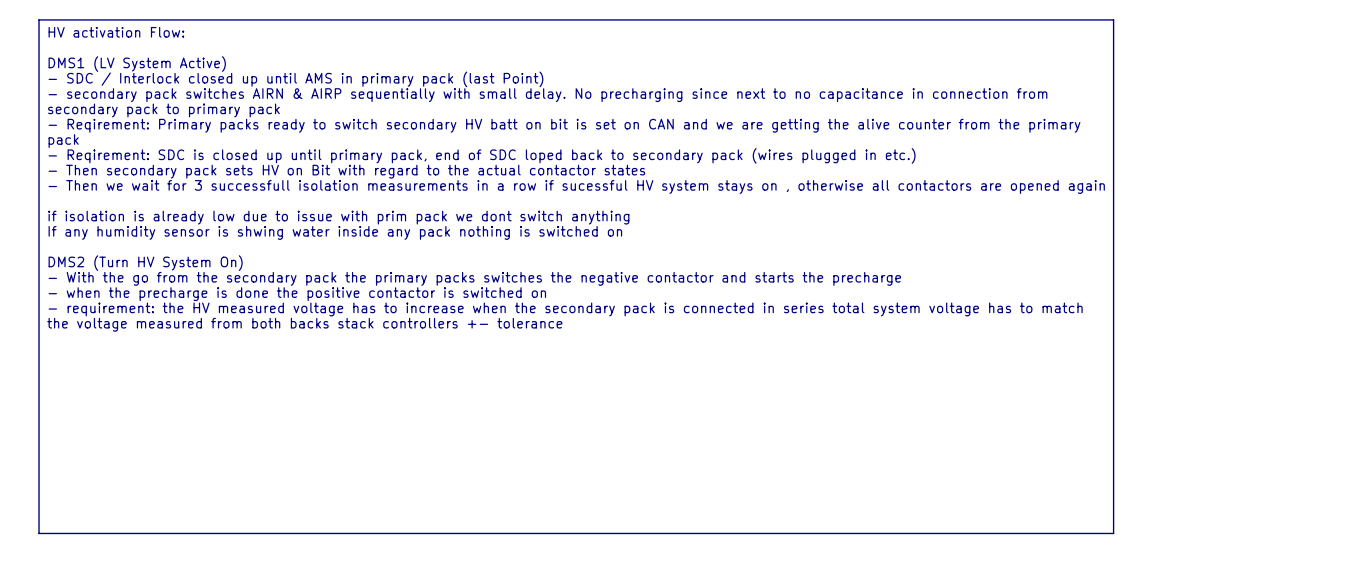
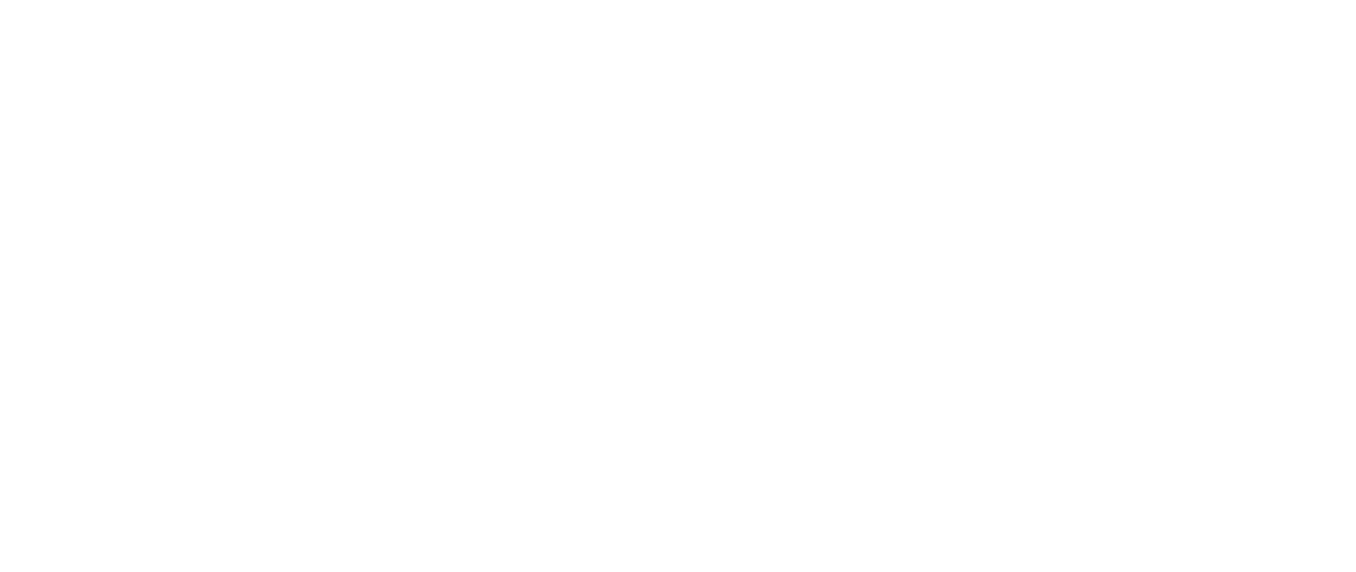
line: (39, 19) (1113, 19) (1113, 533) (39, 533) (39, 19) -> none
text: HV activation Flow: (116, 32) -> none
text: DMS1 (LV System Active) (137, 64) -> none
text: - SDC / Interlock closed up until AMS in primary pack (last Point) (295, 79) -> none
text: - secondary pack switches AIRN & AIRP sequentially with small delay. No precharging since next to no capacitance in connection from (547, 95) -> none
text: secondary pack to primary pack (163, 110) -> none
text: - Reqirement: Primary packs ready to switch secondary HV batt on bit is set on CAN and we are getting the alive counter from the primary (564, 125) -> none
text: pack (63, 141) -> none
text: - Reqirement: SDC is closed up until primary pack, end of SDC loped back to secondary pack (wires plugged in etc.) (482, 155) -> none
text: - Then secondary pack sets HV on Bit with regard to the actual contactor states (346, 171) -> none
text: - Then we wait for 3 successfull isolation measurements in a row if sucessful HV system stays on , otherwise all contactors are opened again (576, 186) -> none
text: if isolation is already low due to issue with prim pack we dont switch anything (338, 217) -> none
text: If any humidity sensor is shwing water inside any pack nothing is switched on (335, 232) -> none
text: DMS2 (Turn HV System On) (145, 263) -> none
text: - With the go from the secondary pack the primary packs switches the negative contactor and starts the precharge (474, 278) -> none
text: - when the precharge is done the positive contactor is switched on (297, 294) -> none
text: - requirement: the HV measured voltage has to increase when the secondary pack is connected in series total system voltage has to match (565, 309) -> none
text: the voltage measured from both backs stack controllers +- tolerance (304, 324) -> none

